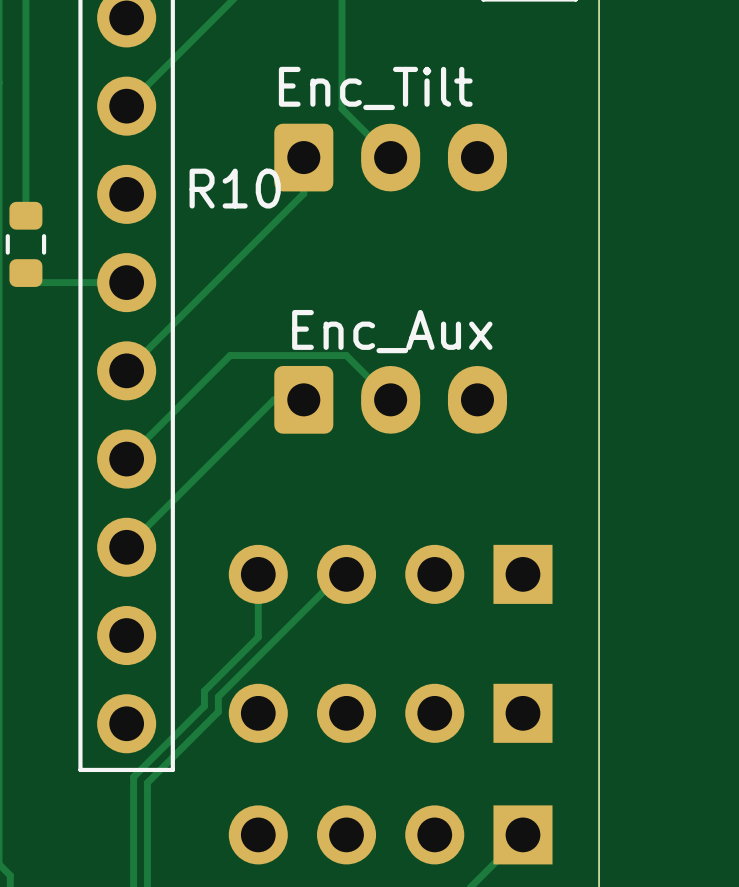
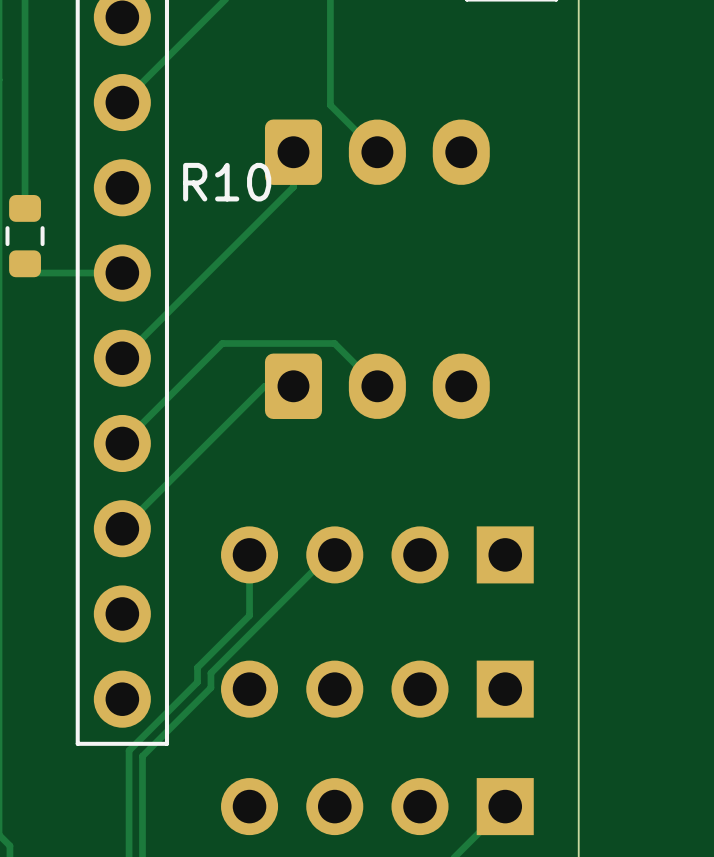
part value: Enc_Tilt (375, 88) -> none
part value: Enc_Aux (392, 331) -> none

